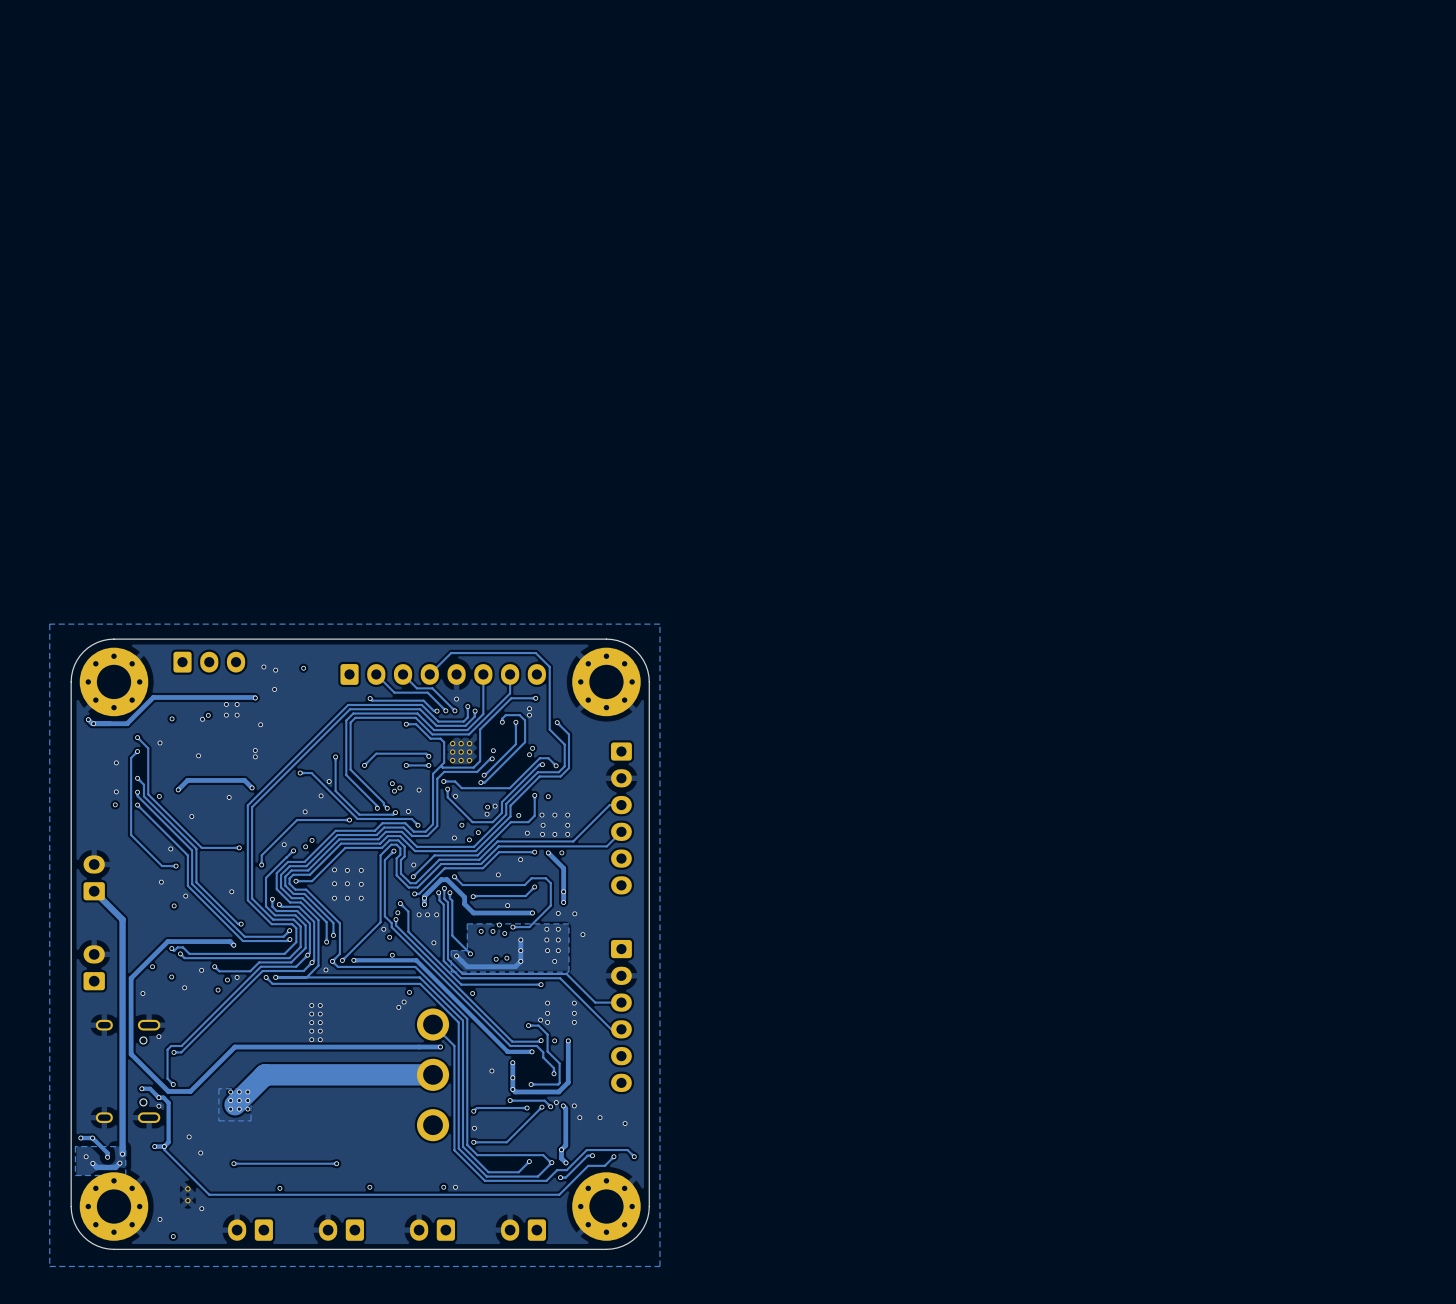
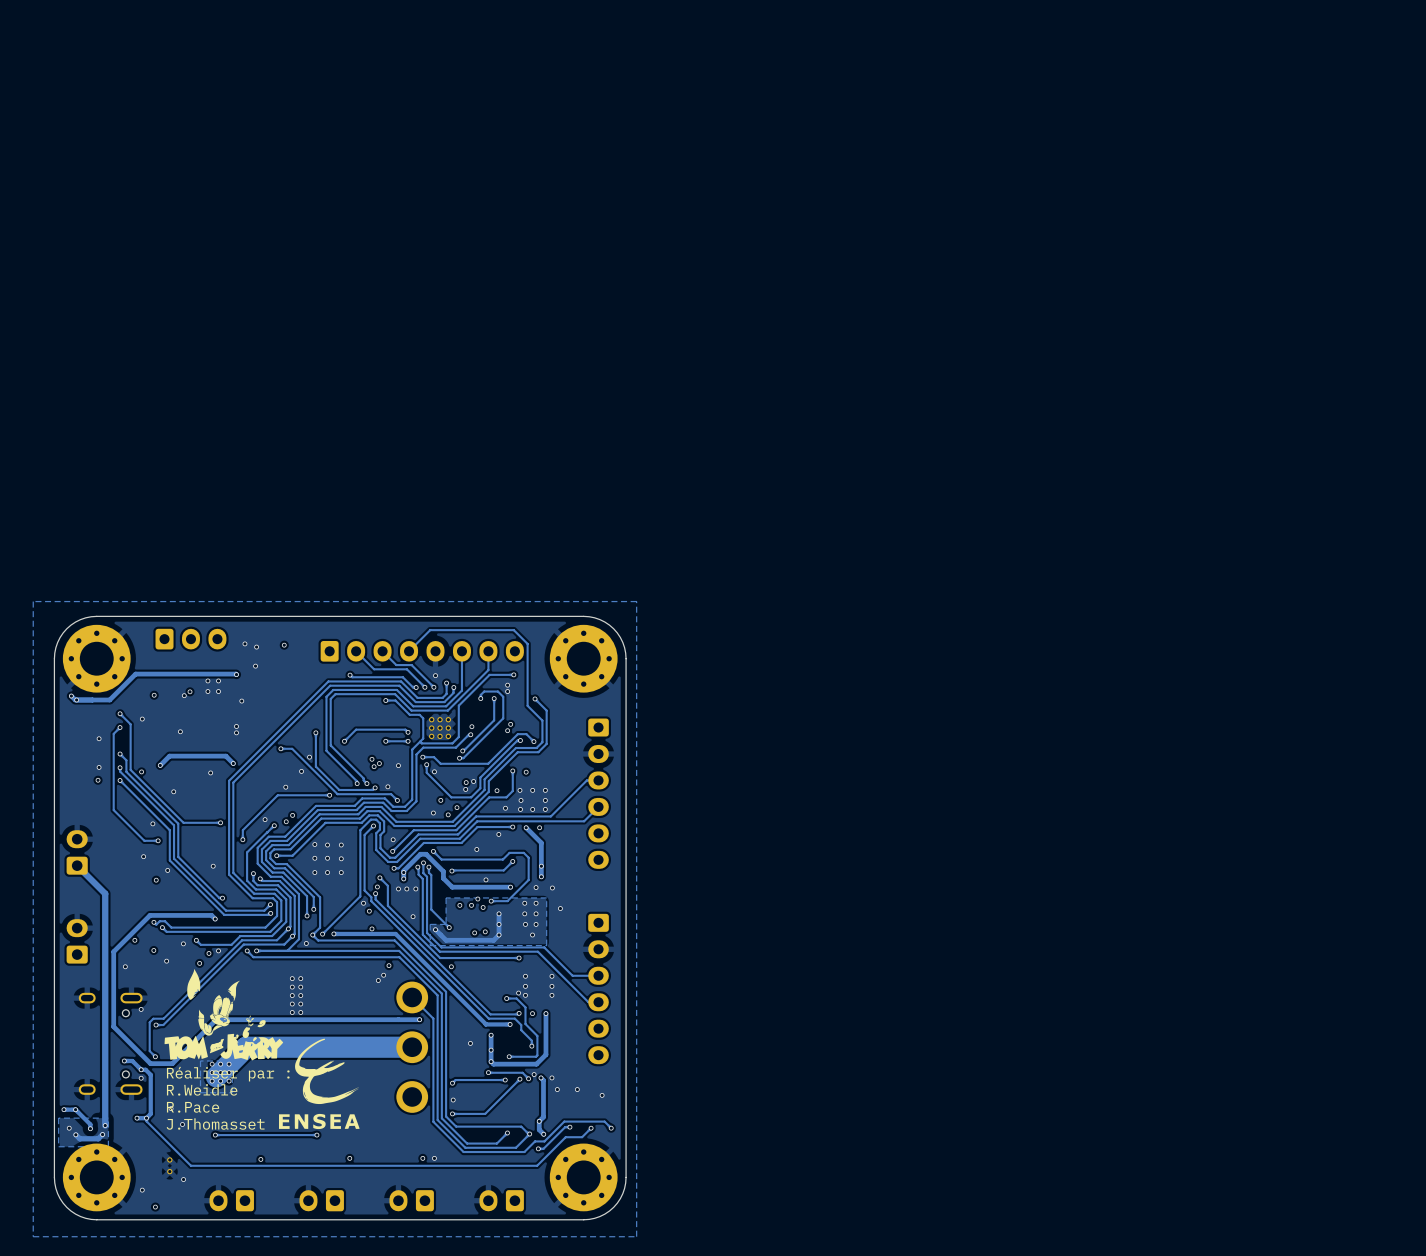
drawing: none -> [164, 968, 360, 1130]
text: none -> Réaliser par : (228, 1074)
text: none -> R.Weidle (202, 1089)
text: none -> R.Pace (193, 1107)
text: none -> J.Thomasset (215, 1124)

